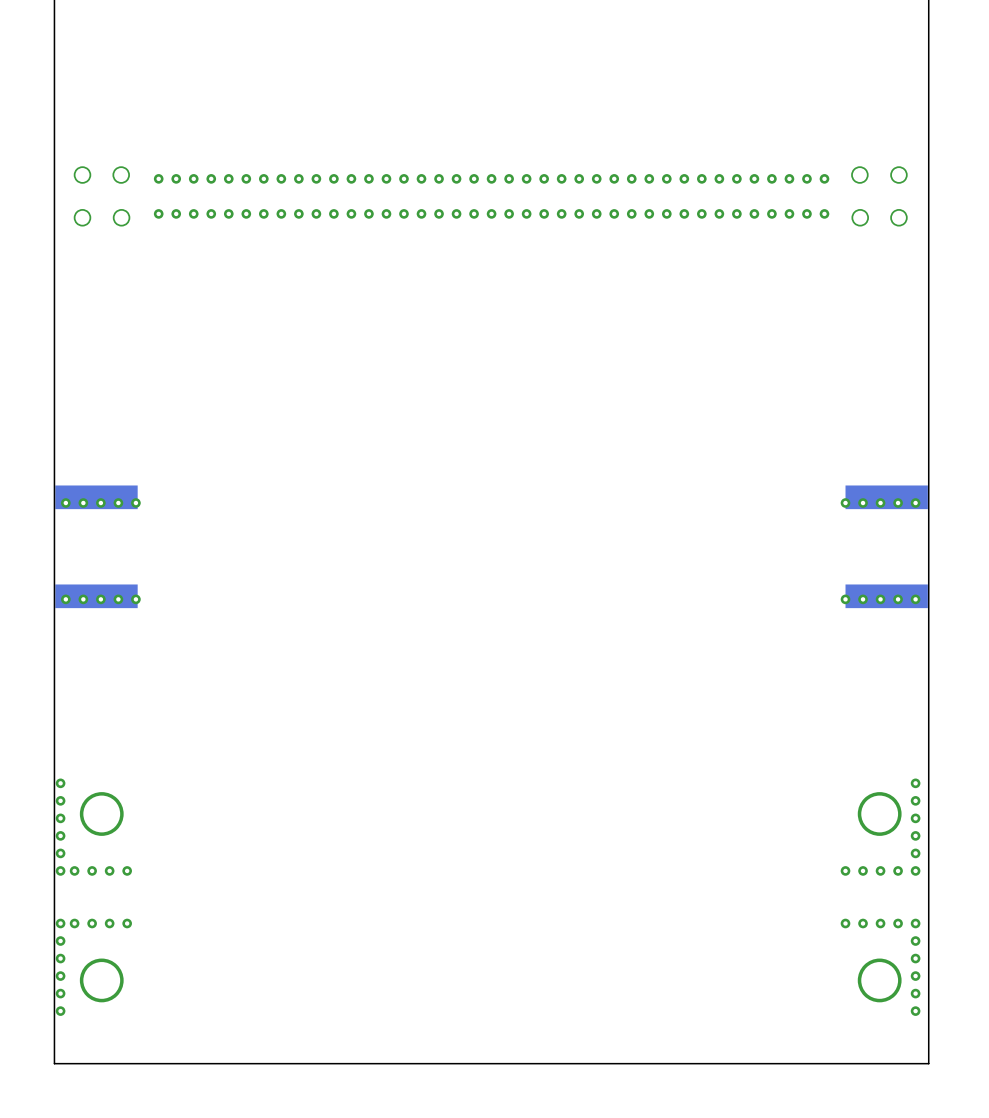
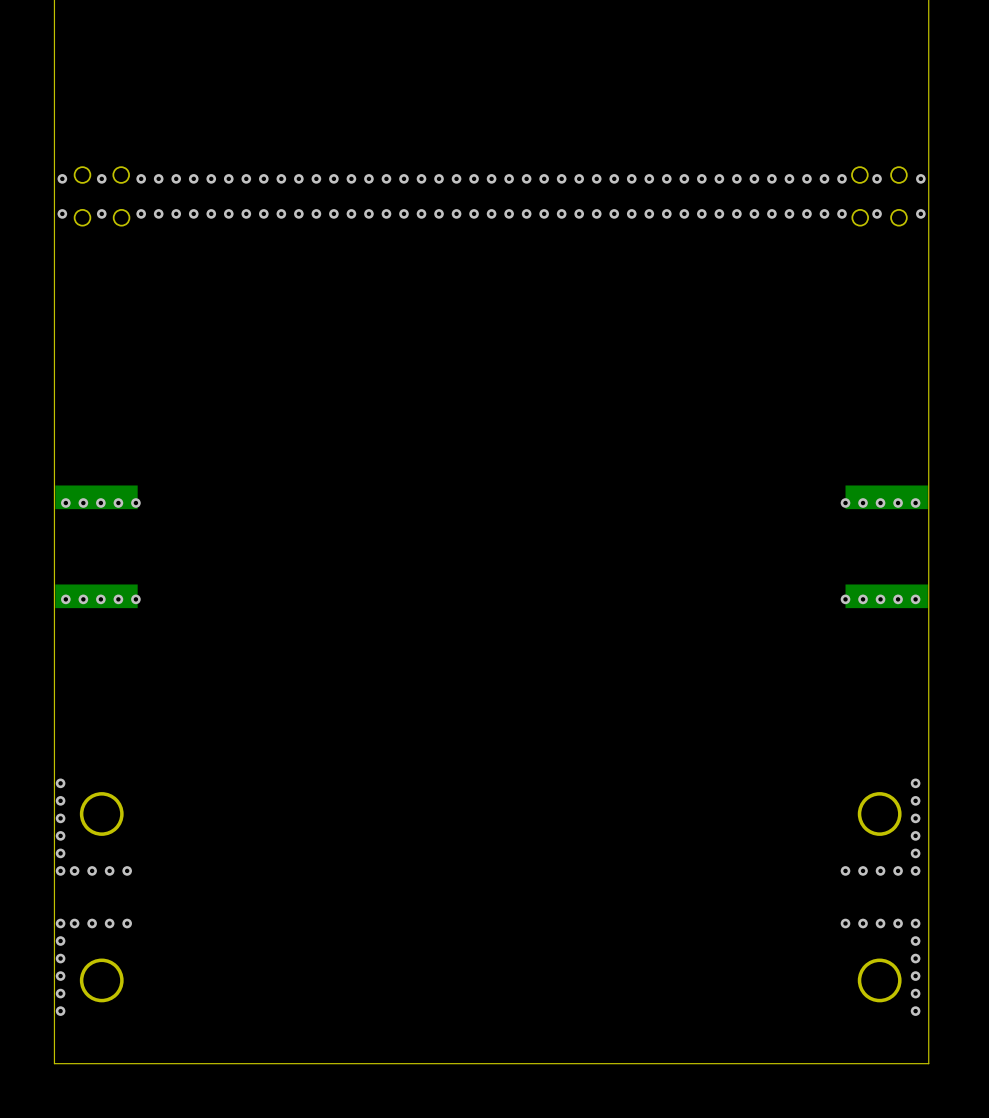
via: none -> (62, 178)
via: none -> (101, 178)
via: none -> (141, 178)
via: none -> (842, 178)
via: none -> (877, 178)
via: none -> (920, 178)
via: none -> (62, 213)
via: none -> (101, 213)
via: none -> (141, 213)
via: none -> (842, 213)
via: none -> (877, 213)
via: none -> (920, 213)

